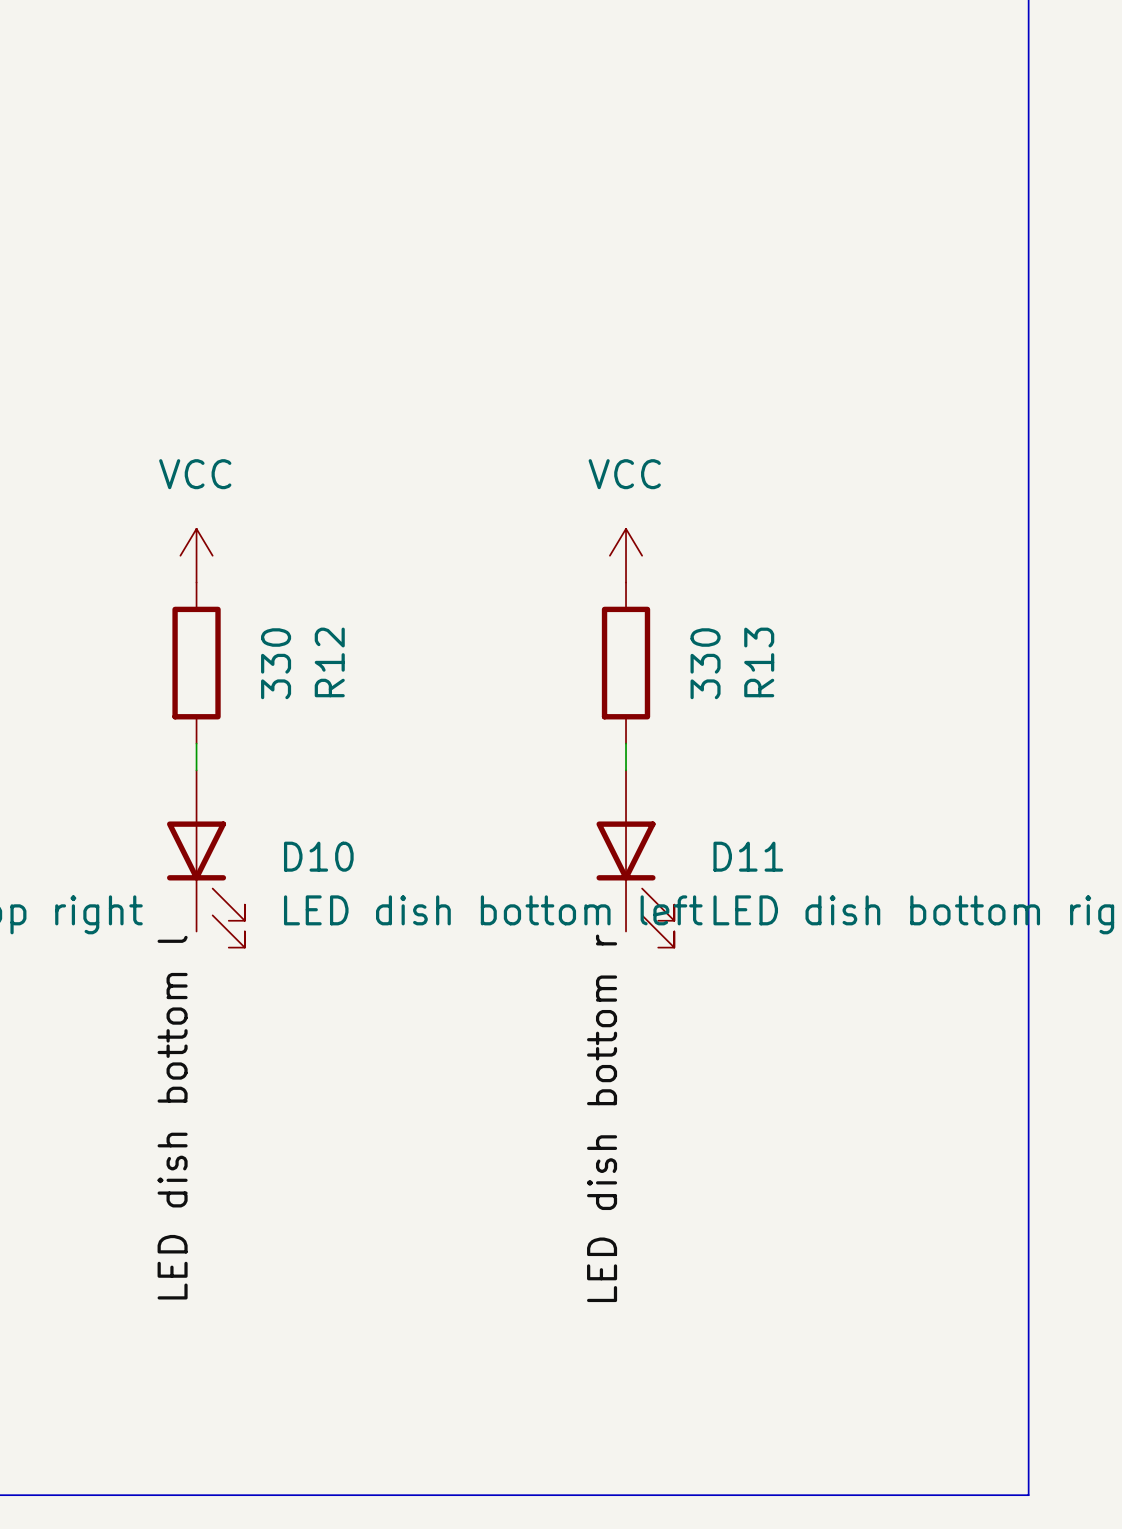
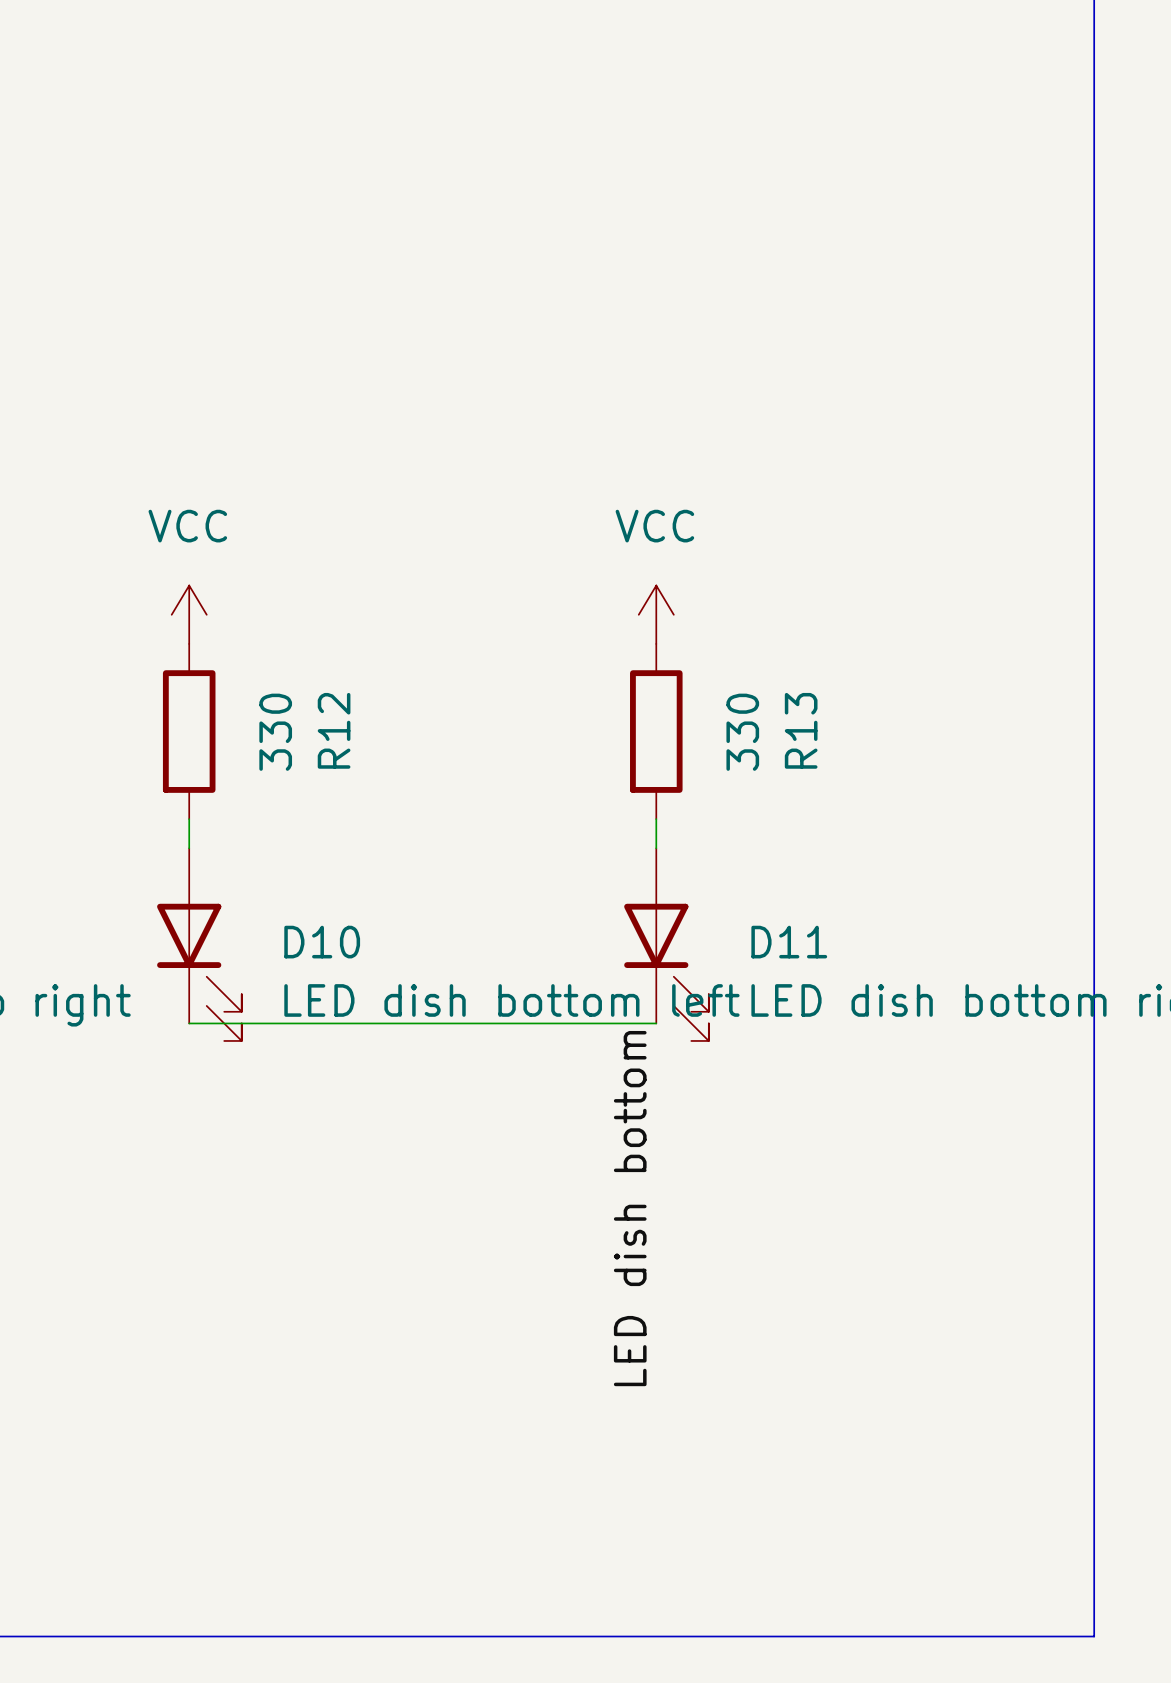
wire: none -> (189, 1023) (656, 1023)
label: LED dish bottom l (172, 1117) -> none
label: LED dish bottom r (602, 1118) -> LED dish bottom (630, 1208)

